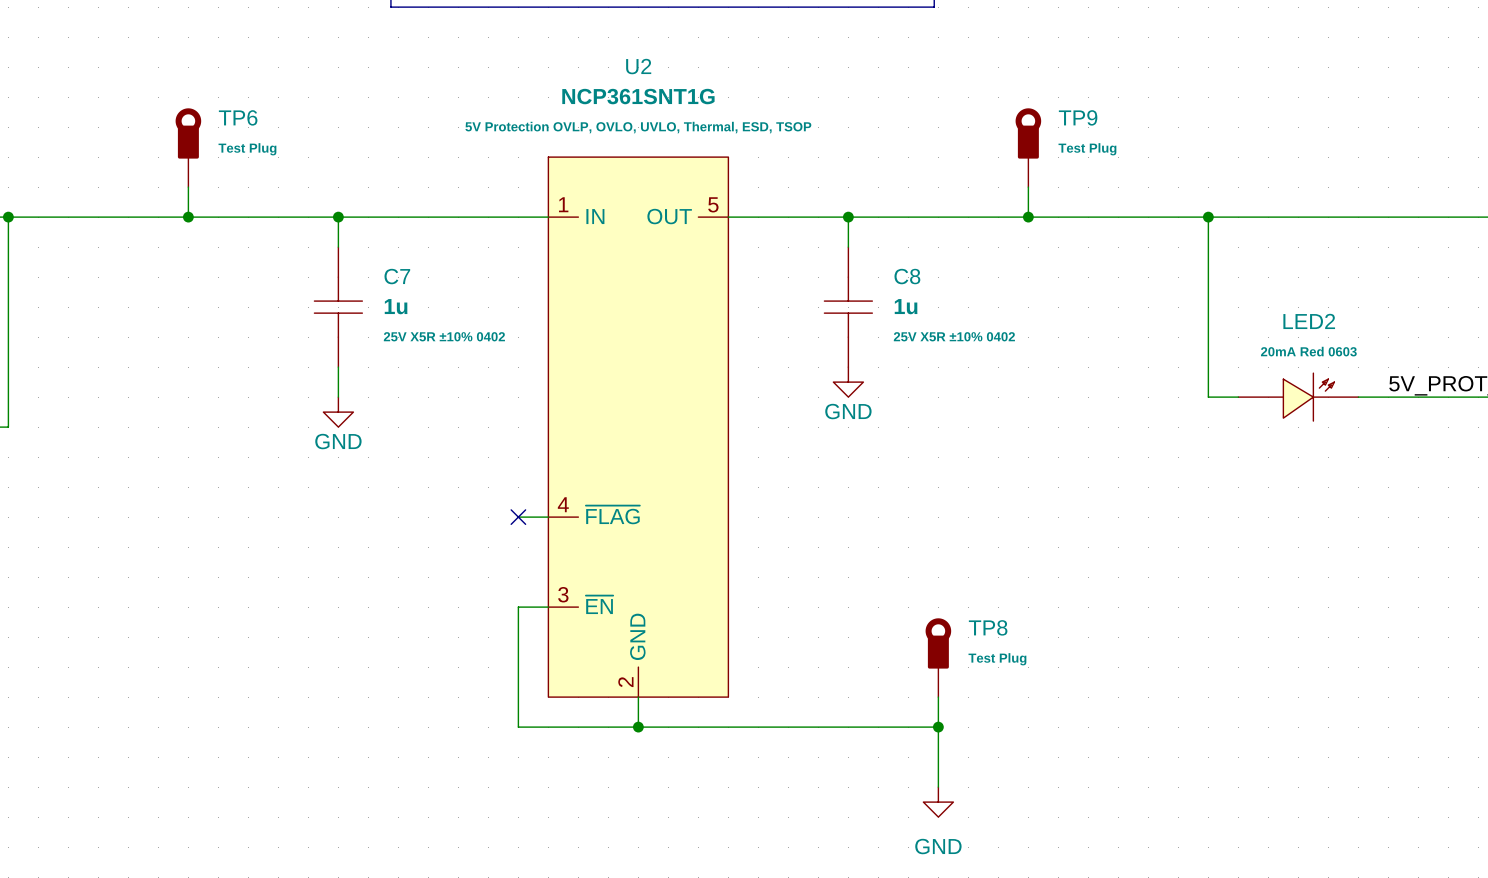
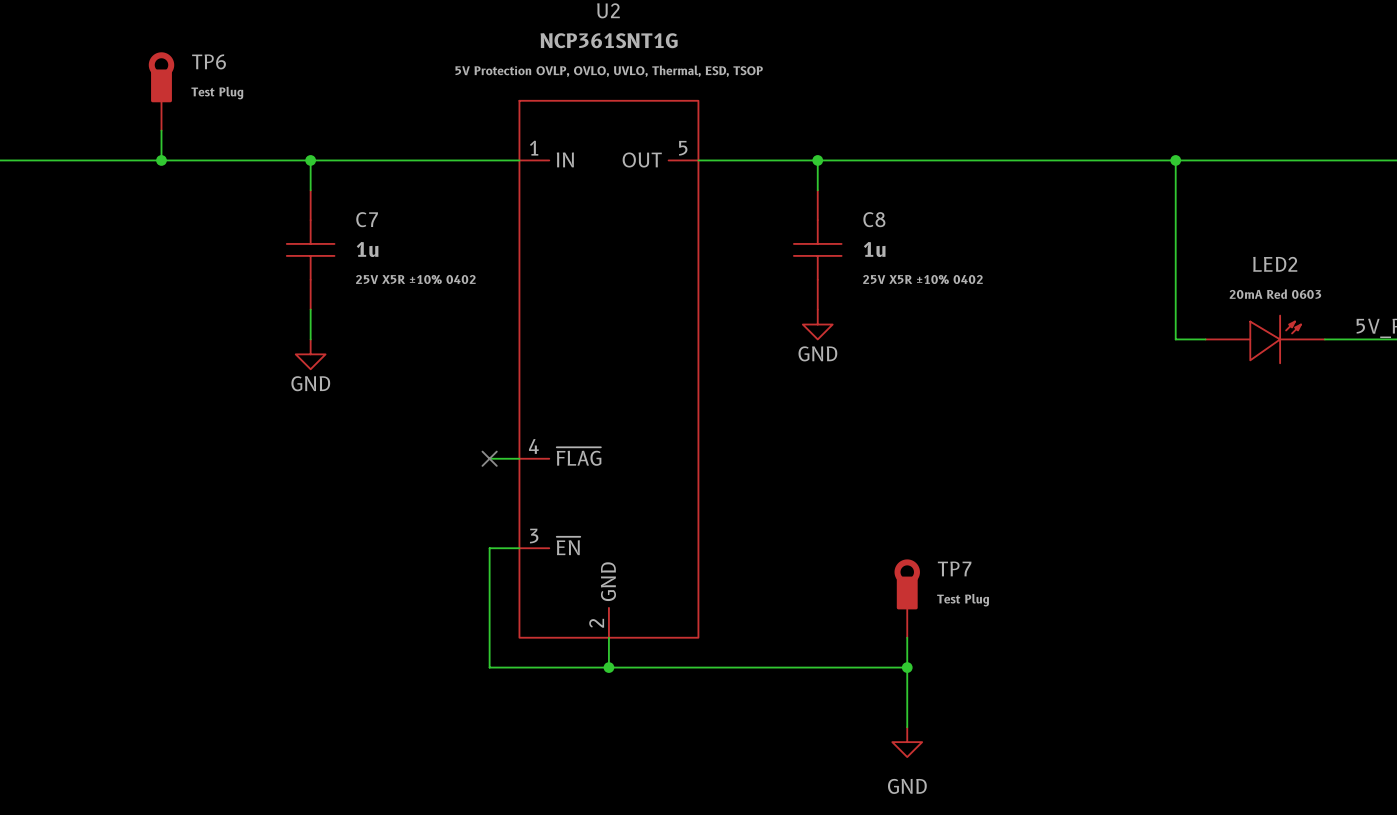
TP9: (1028, 147) -> none
wire: (1028, 187) (1028, 217) -> none
junction: (1028, 217) -> none
TP8 name: TP8 (988, 627) -> TP7 (954, 568)

